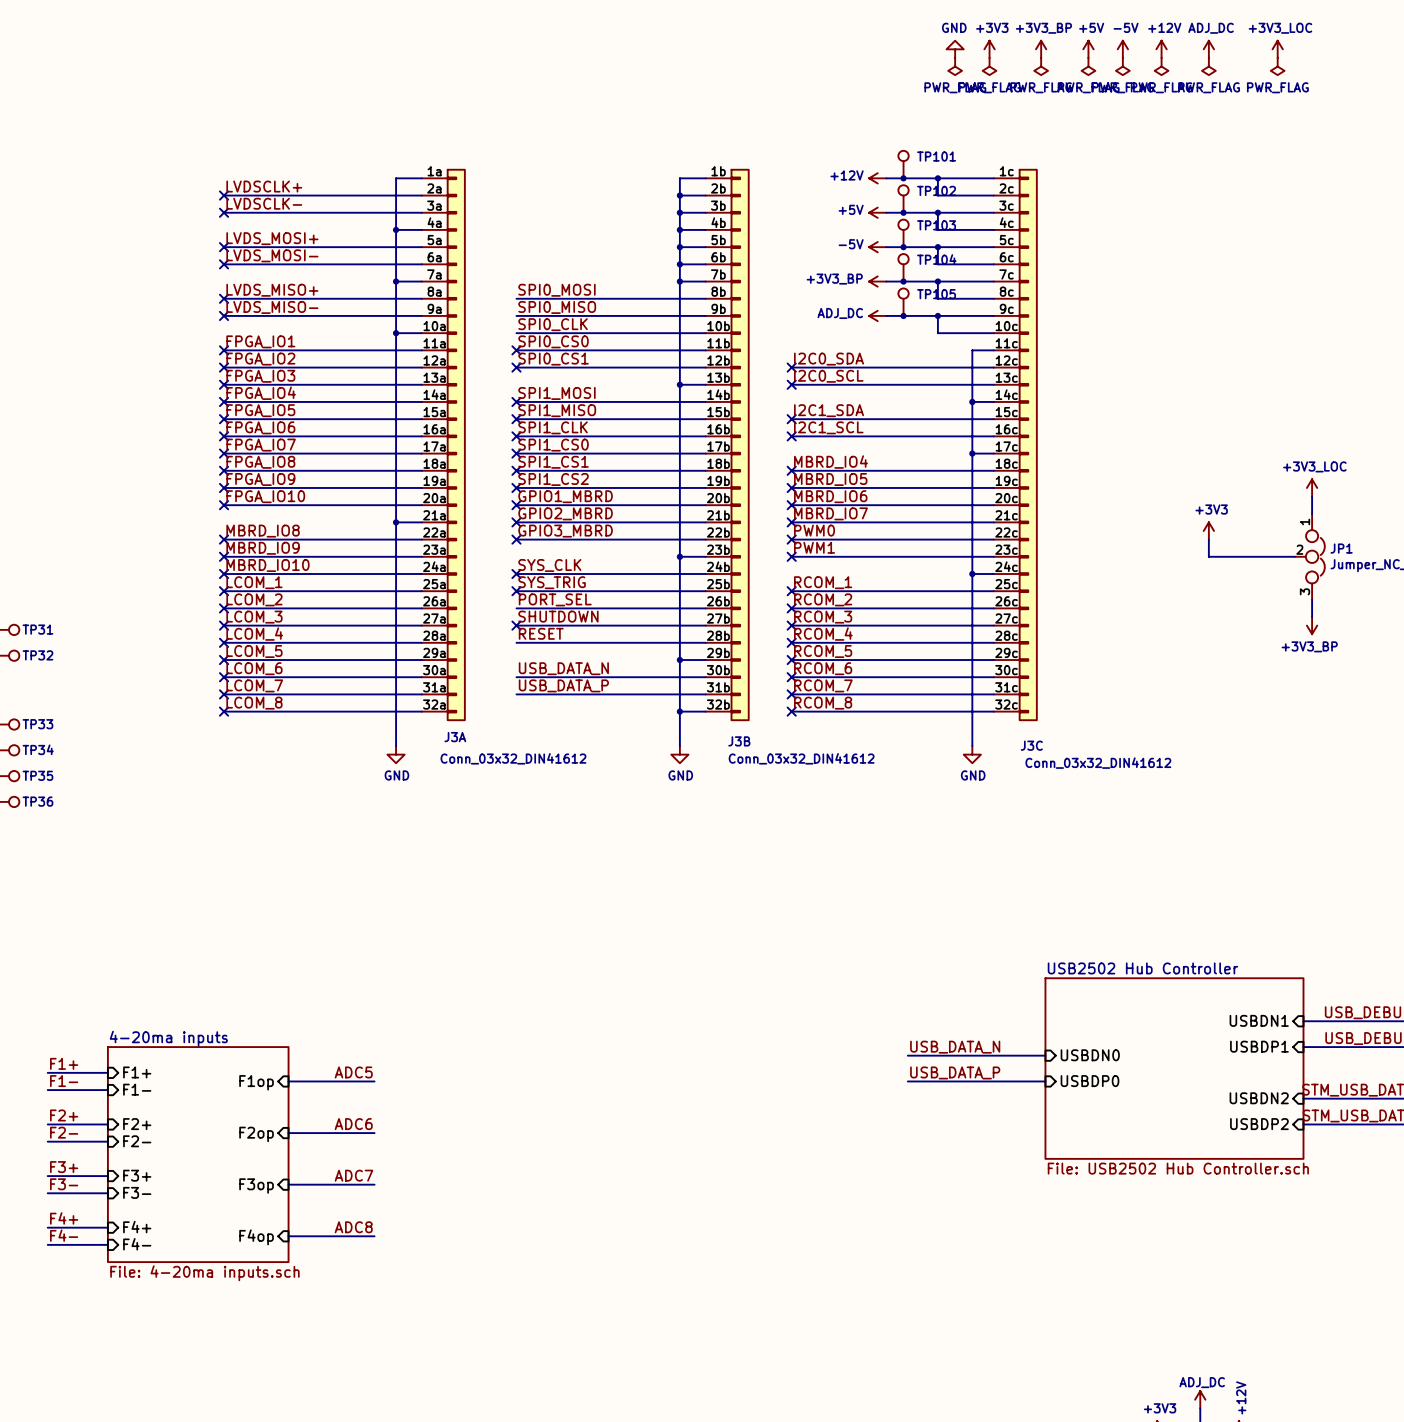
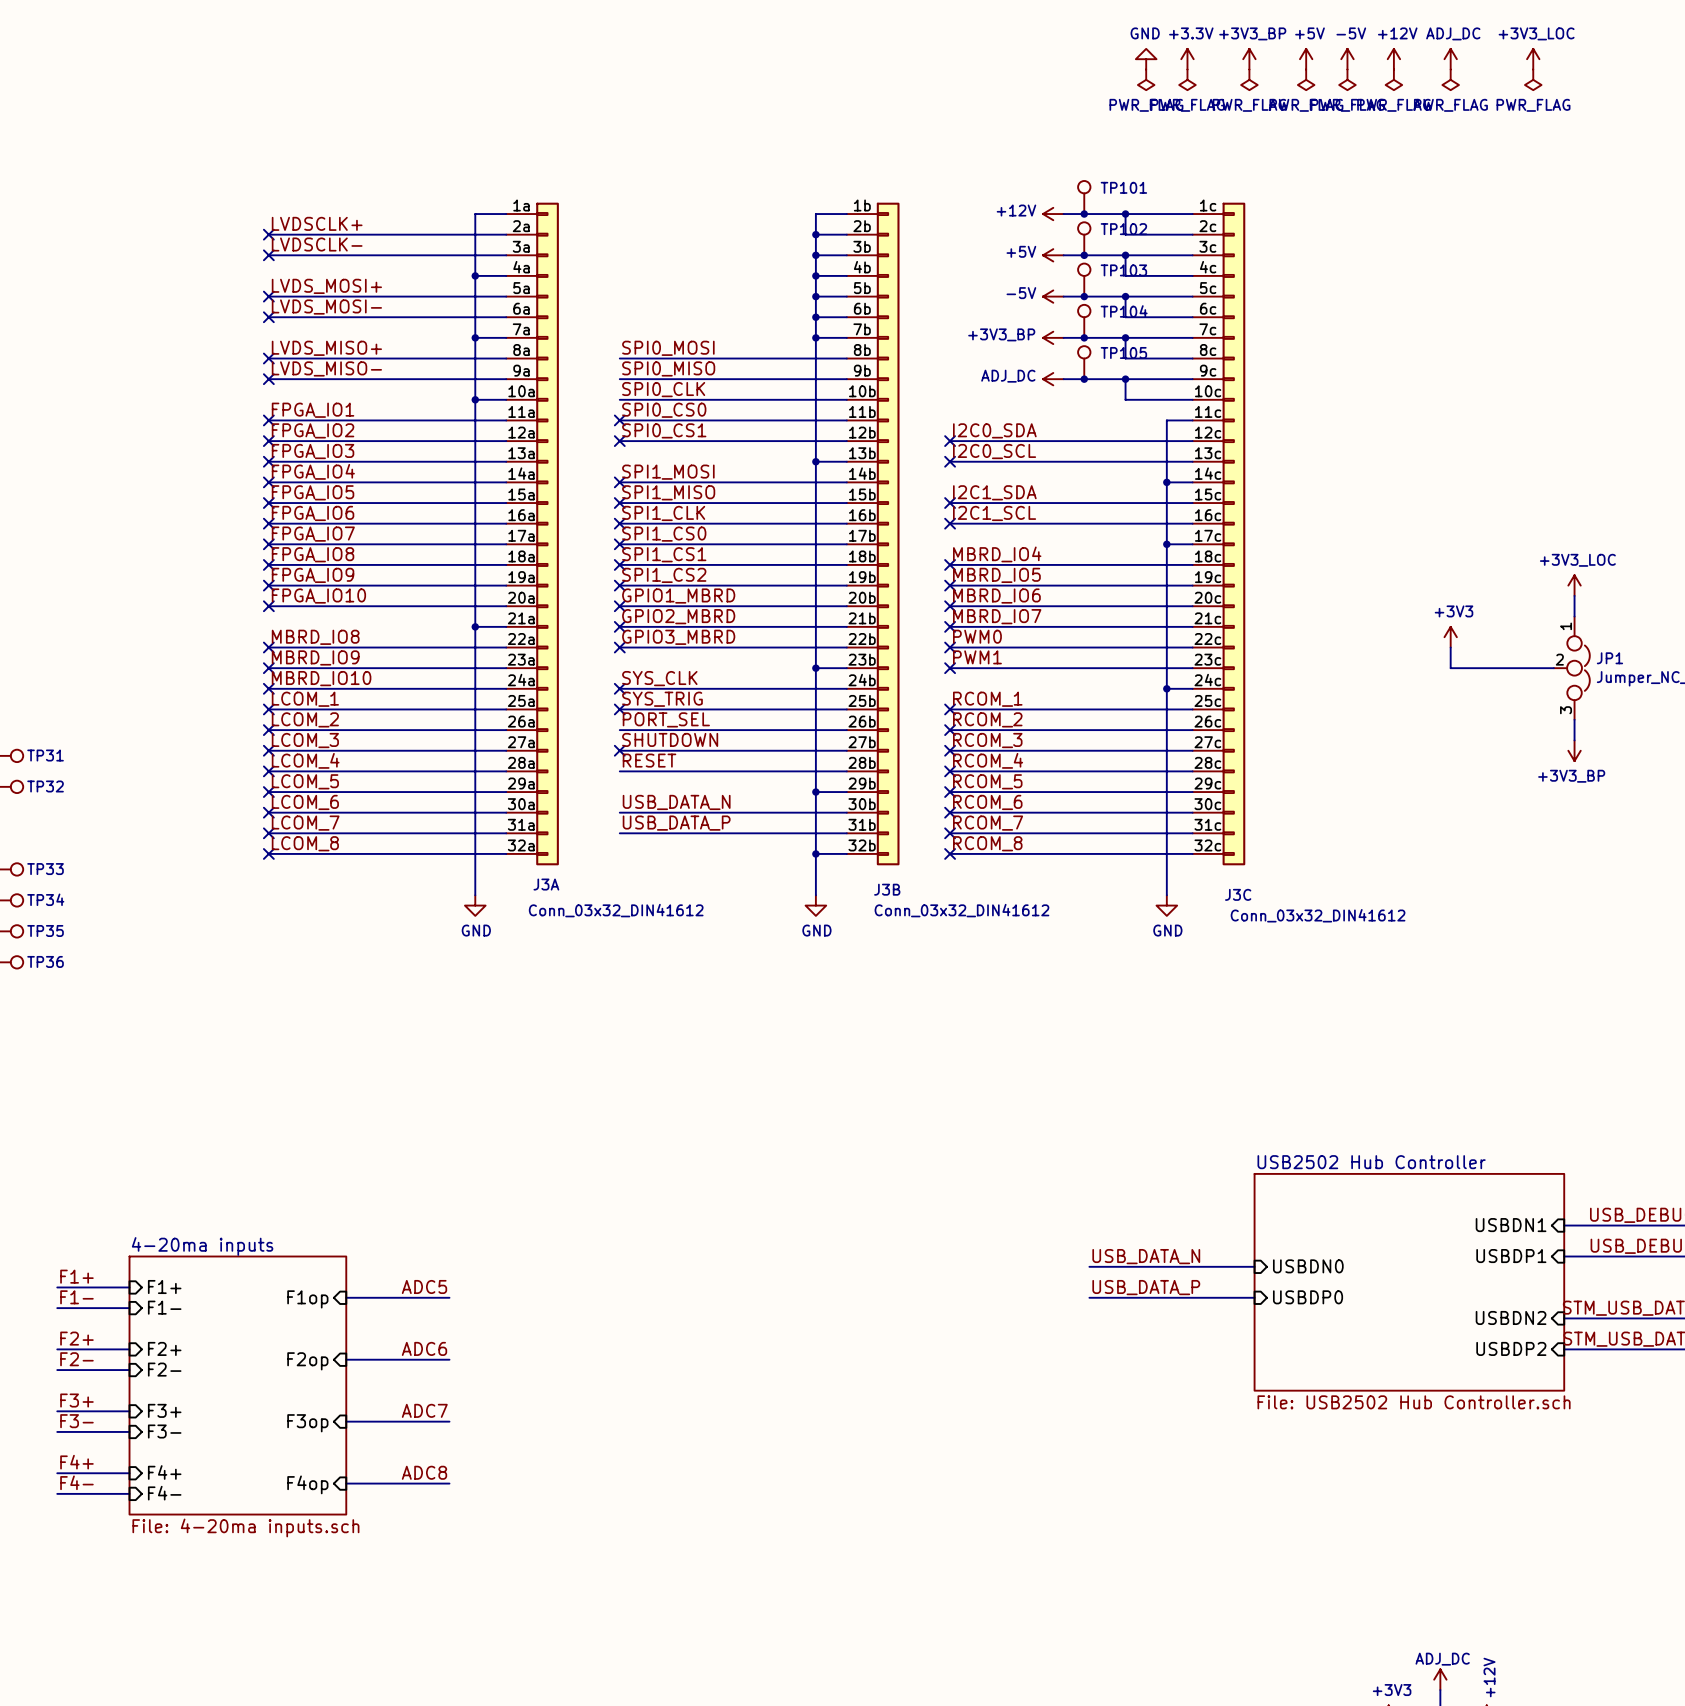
power symbol: +3V3 (989, 49) -> +3.3V (1187, 59)

